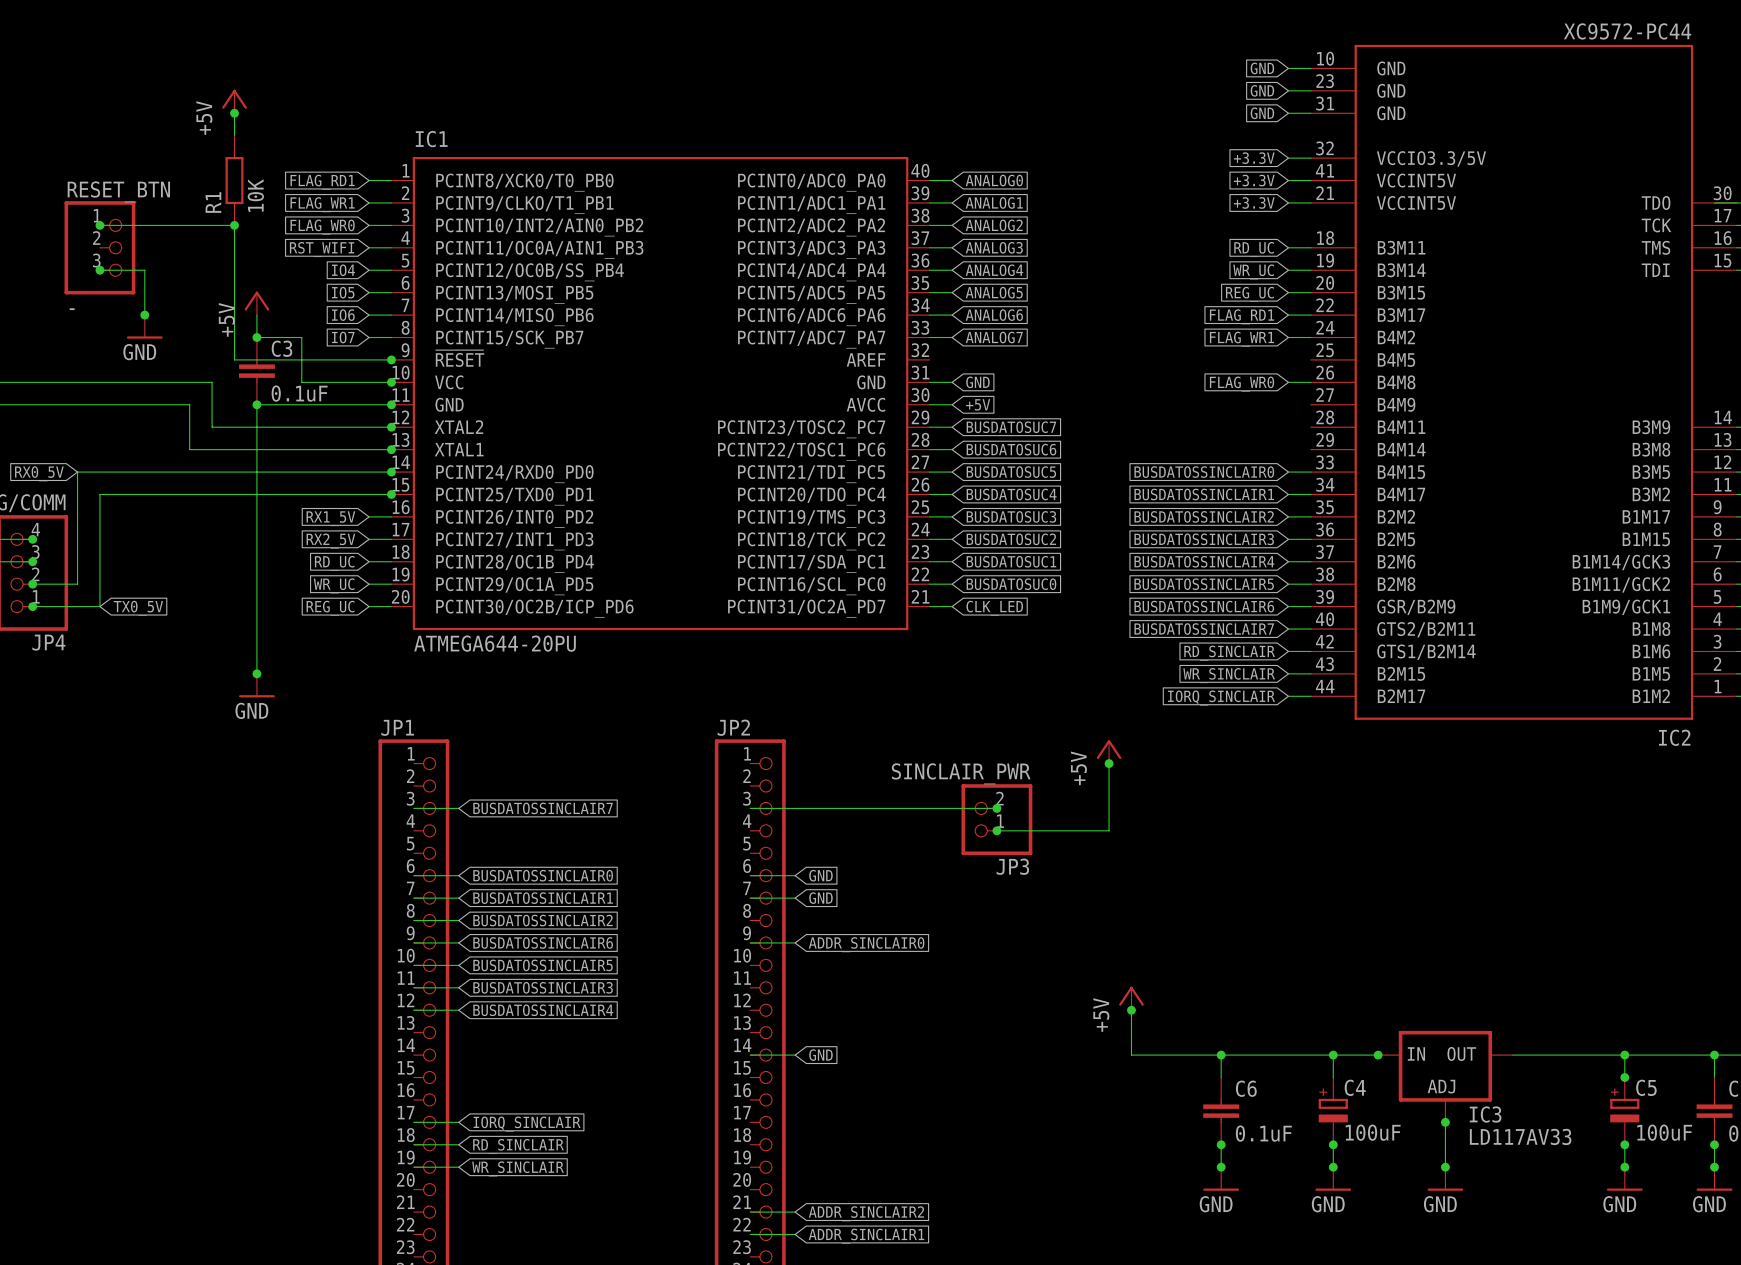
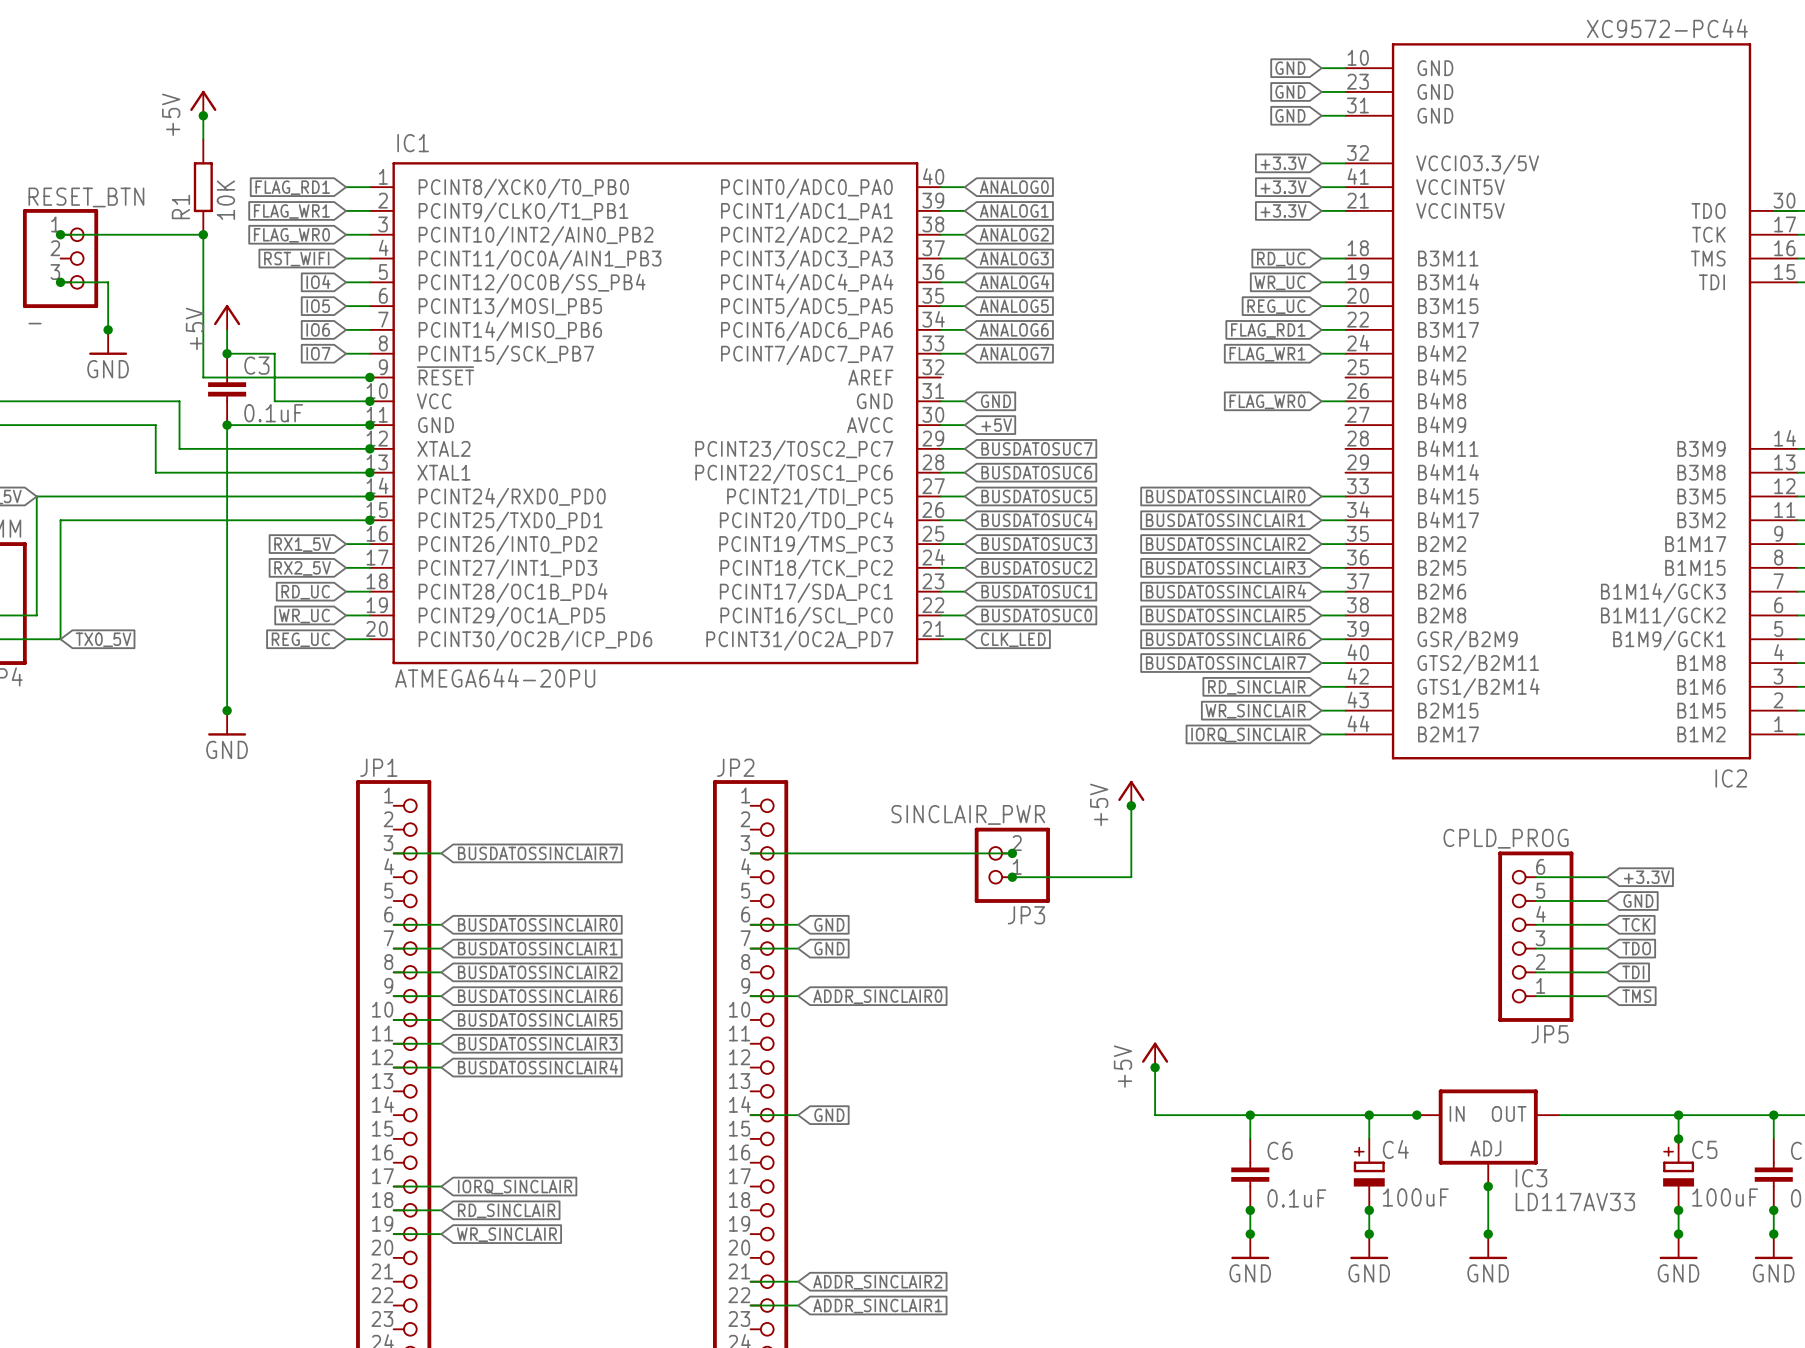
wire: none -> (1535, 877) (1607, 877)
global label: none -> +3.3V (1646, 877)
wire: none -> (1535, 900) (1607, 900)
global label: none -> GND (1638, 900)
wire: none -> (1535, 924) (1607, 924)
global label: none -> TCK (1636, 924)
JP5: none -> CPLD_PROG (1535, 936)
wire: none -> (1535, 948) (1607, 948)
global label: none -> TDO (1636, 948)
wire: none -> (1535, 972) (1607, 972)
global label: none -> TDI (1633, 972)
wire: none -> (1535, 996) (1607, 996)
global label: none -> TMS (1636, 996)

